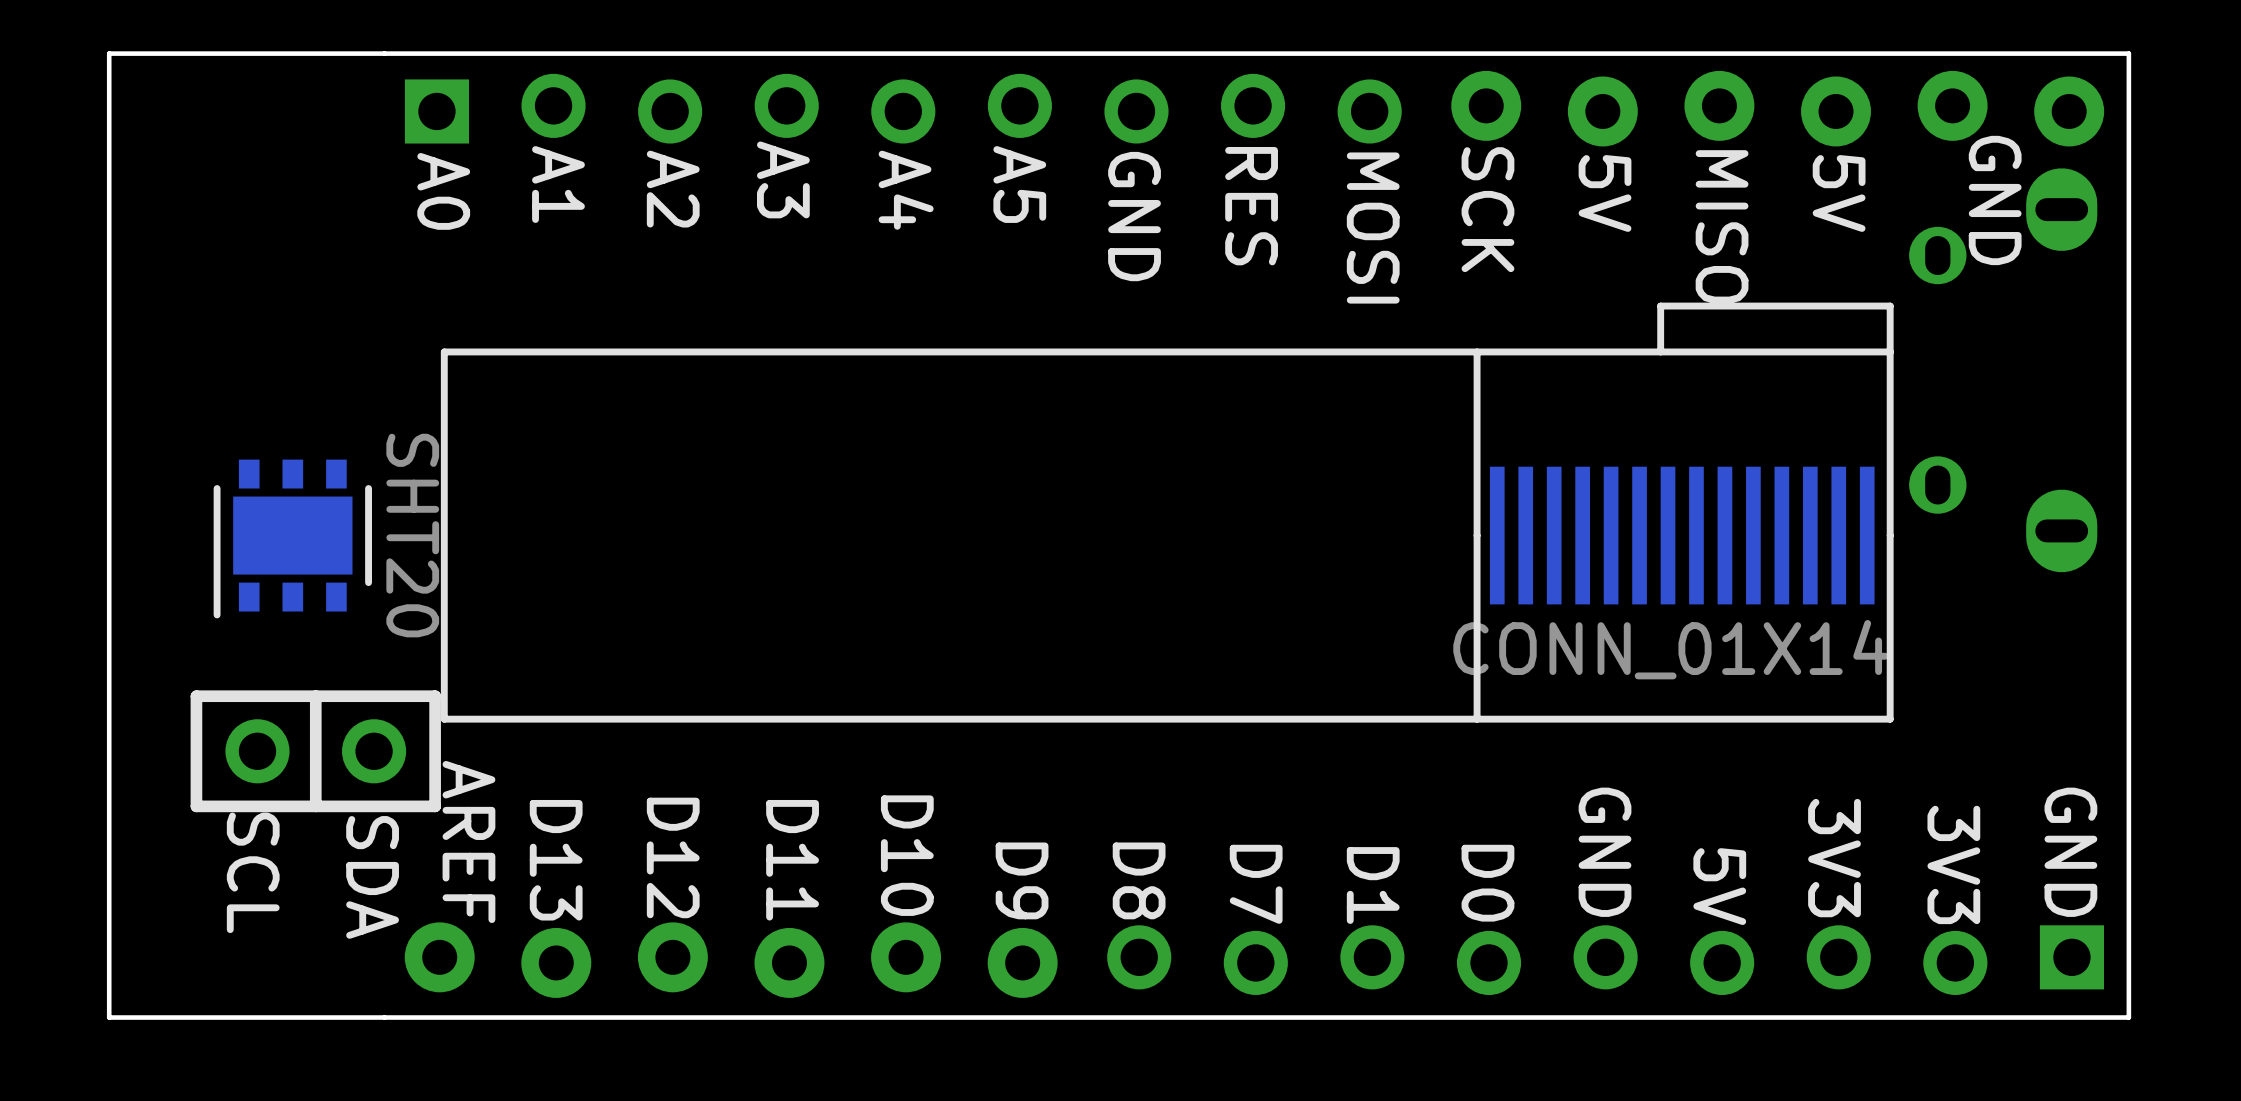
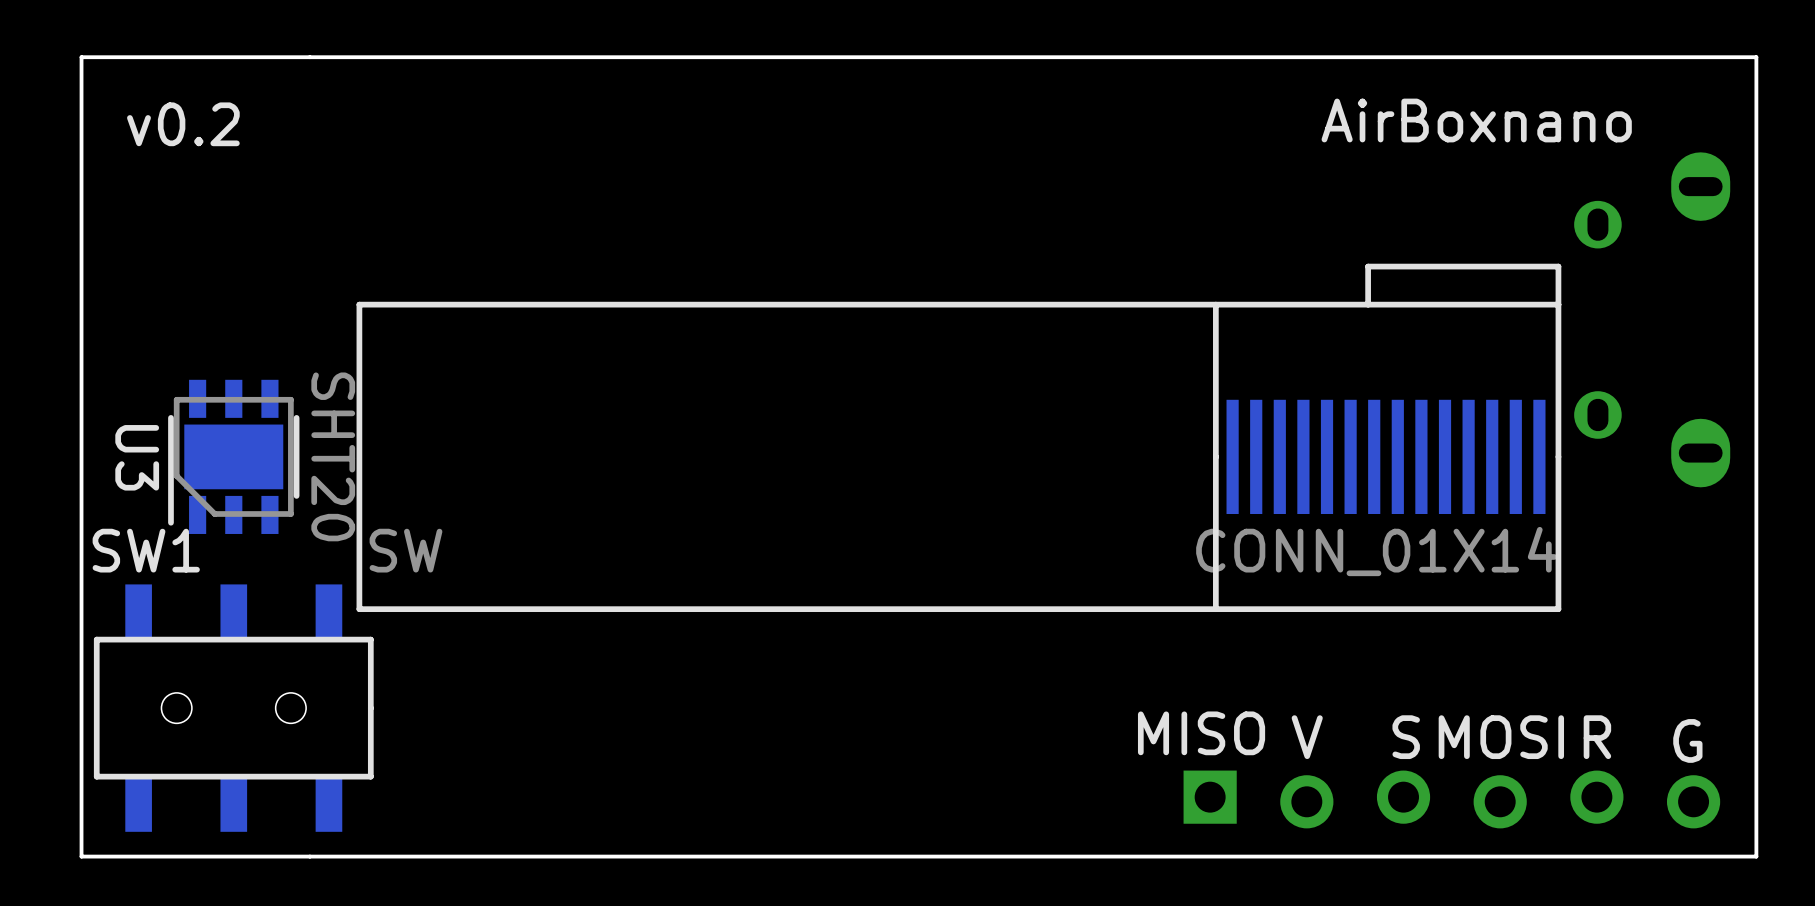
part: (1254, 108) -> none
text: none -> AirBoxnano (1476, 120)
text: none -> v0.2 (183, 124)
text: A3 (783, 179) -> none
text: A1 (558, 184) -> none
text: A5 (1019, 184) -> none
text: A2 (673, 189) -> none
text: A4 (906, 190) -> none
text: A0 (443, 191) -> none
text: 5V (1605, 193) -> none
text: 5V (1839, 193) -> none
text: GND (1995, 200) -> none
text: RES (1251, 206) -> none
text: SCK (1487, 209) -> none
text: GND (1134, 216) -> none
text rotation: 0° (1722, 226) -> 90° counterclockwise (1201, 733)
text position: MISO (1722, 226) -> MISO (1201, 733)
text rotation: 0° (1373, 228) -> 90° counterclockwise (1501, 737)
text position: MOSI (1373, 228) -> MOSI (1501, 737)
U3: none -> SHT20 (233, 456)
part: SHT20 (292, 539) -> none
part: (315, 751) -> none
SW1: none -> SW (233, 708)
text: AREF (468, 842) -> none
text: GND (1605, 852) -> V (1307, 737)
text: GND (2070, 852) -> G (1687, 740)
text: D10 (907, 855) -> none
text: D12 (673, 857) -> none
text: 3V3 (1834, 858) -> none
text: D13 (556, 860) -> none
text: D11 (792, 860) -> none
text: 3V3 (1953, 864) -> R (1597, 737)
text: SCL (253, 872) -> none
text: SDA (372, 877) -> none
text: D9 (1022, 880) -> none
text: D8 (1139, 880) -> none
text: D0 (1487, 883) -> none
text: D7 (1256, 884) -> none
text: D1 (1373, 885) -> none
text: 5V (1719, 886) -> S (1406, 737)
part: none -> (1451, 799)
part: (1254, 960) -> none

